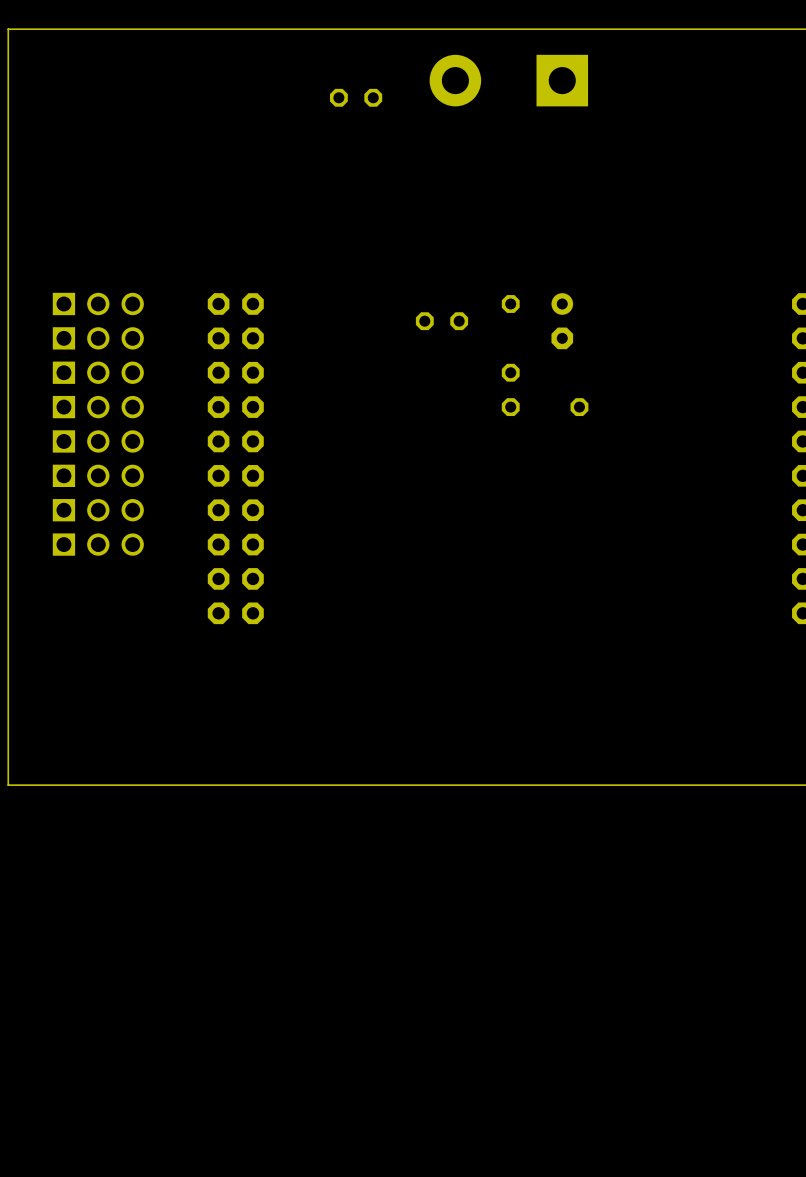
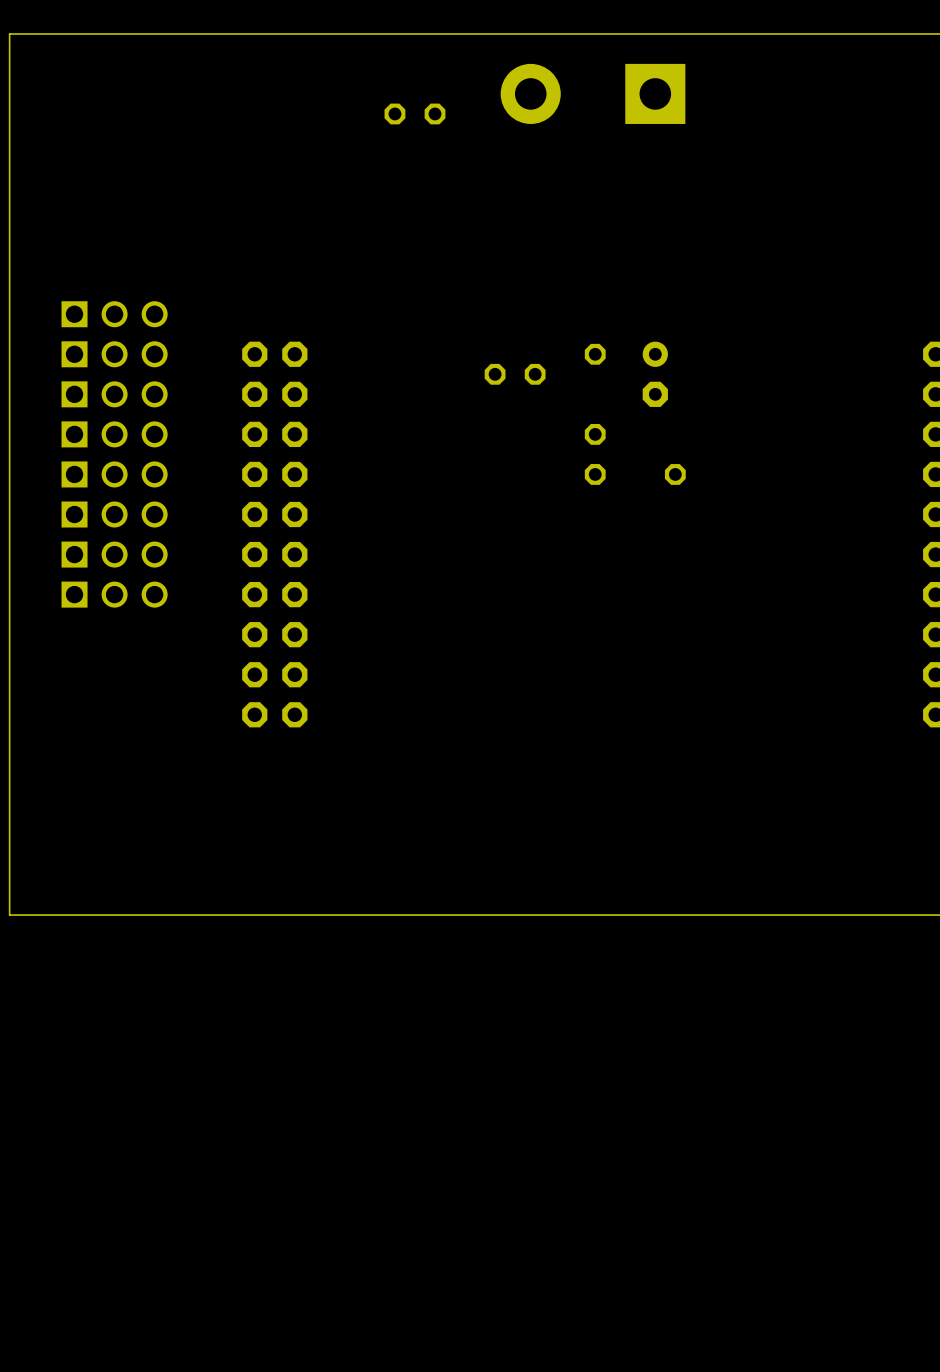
part position: (98, 544) -> (114, 314)

